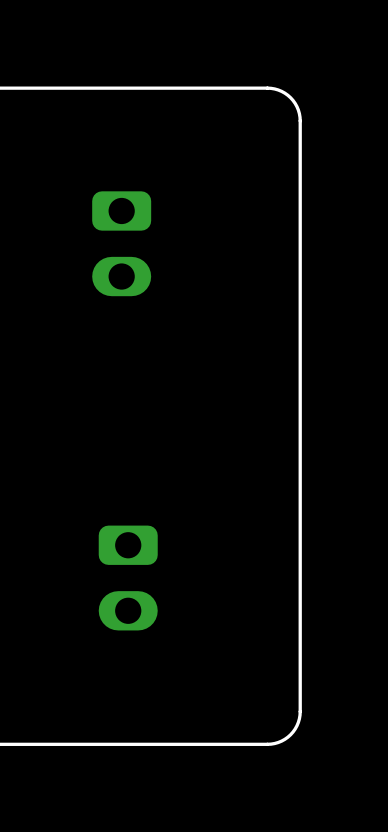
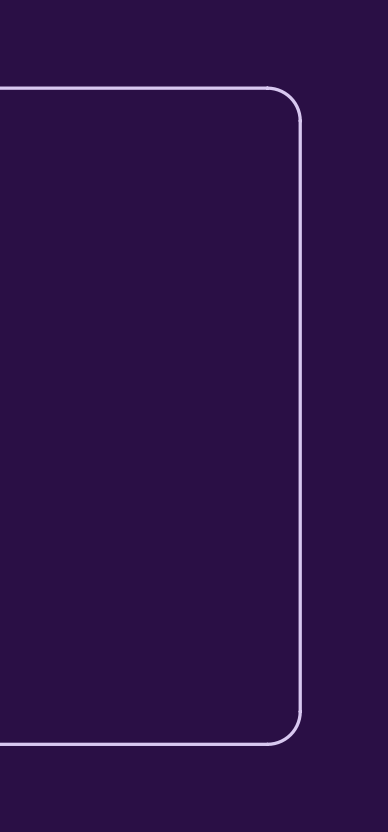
part: (121, 243) -> none
part: (128, 578) -> none

